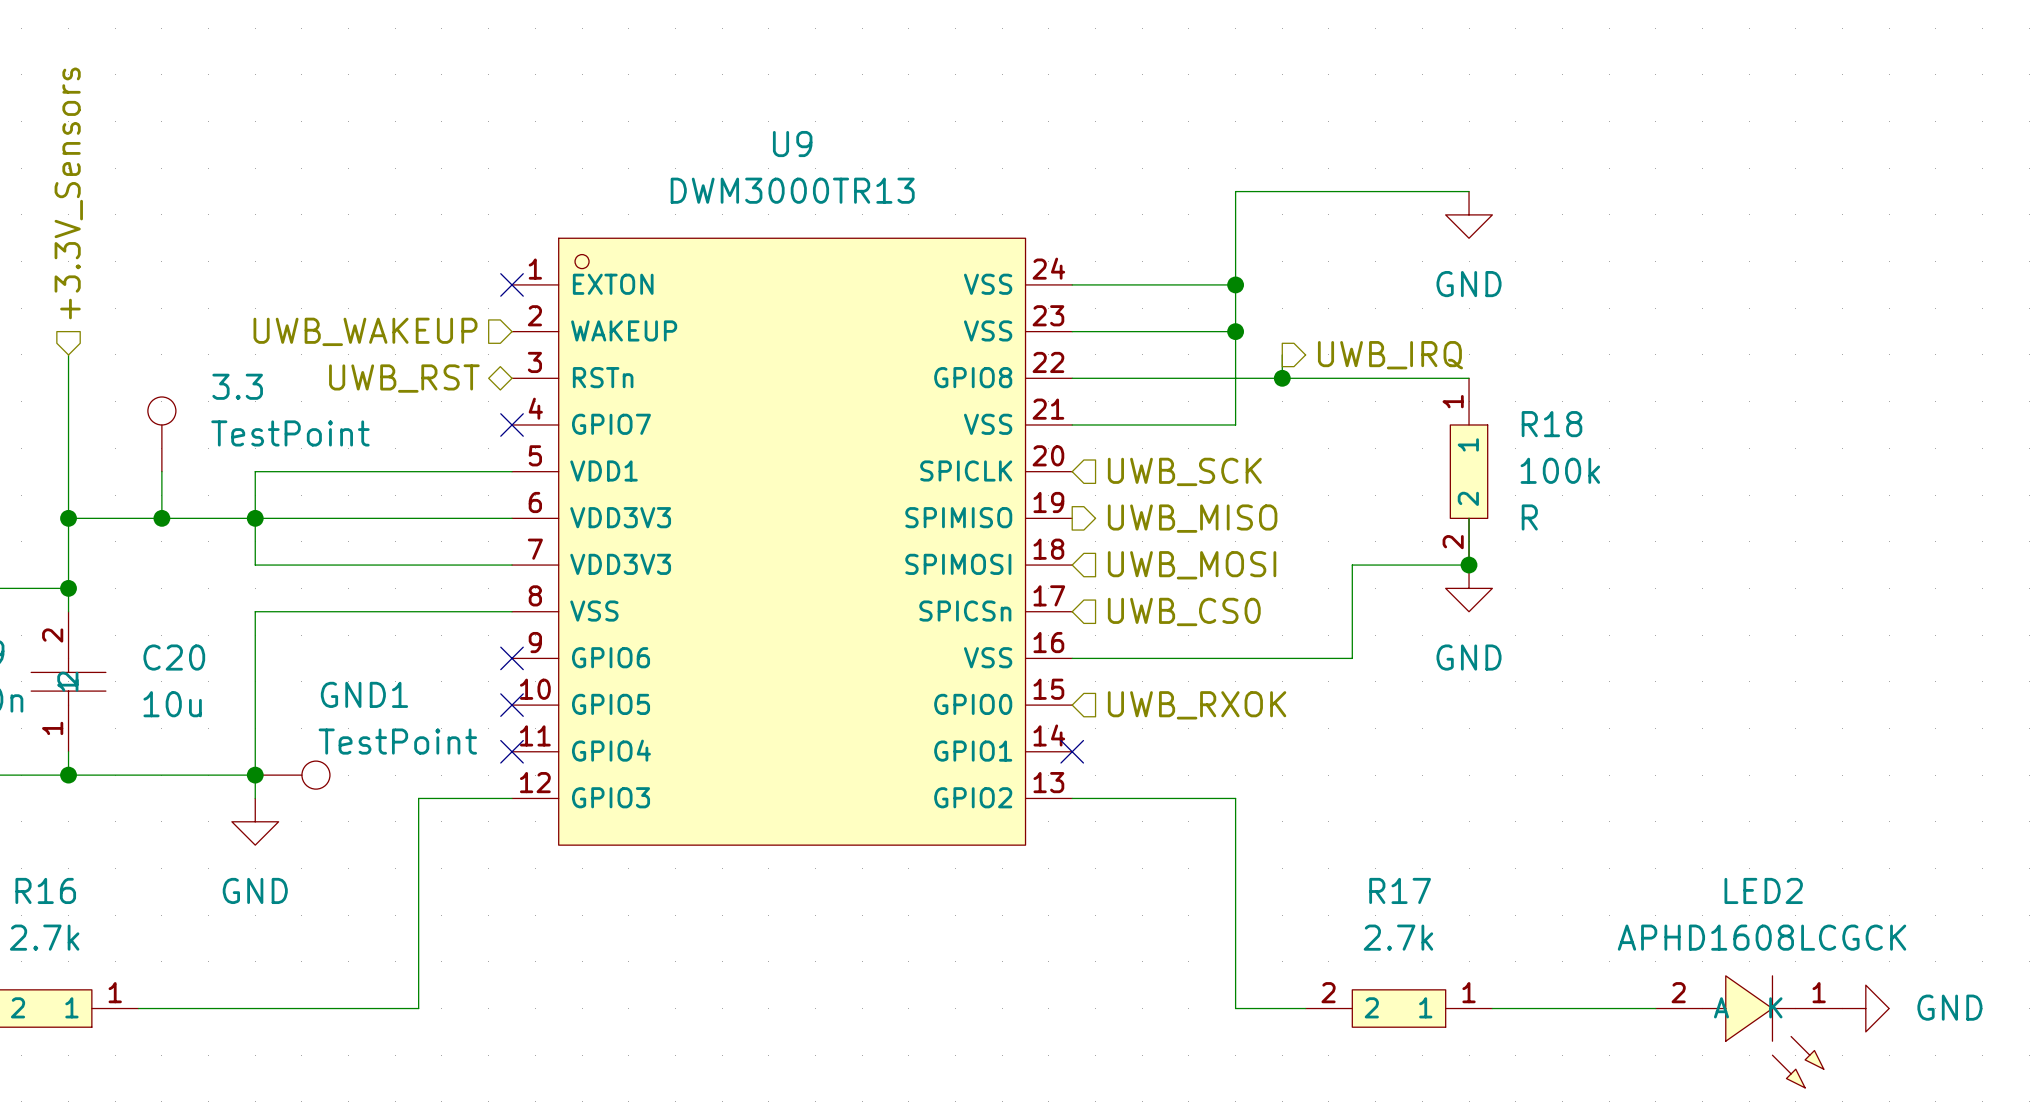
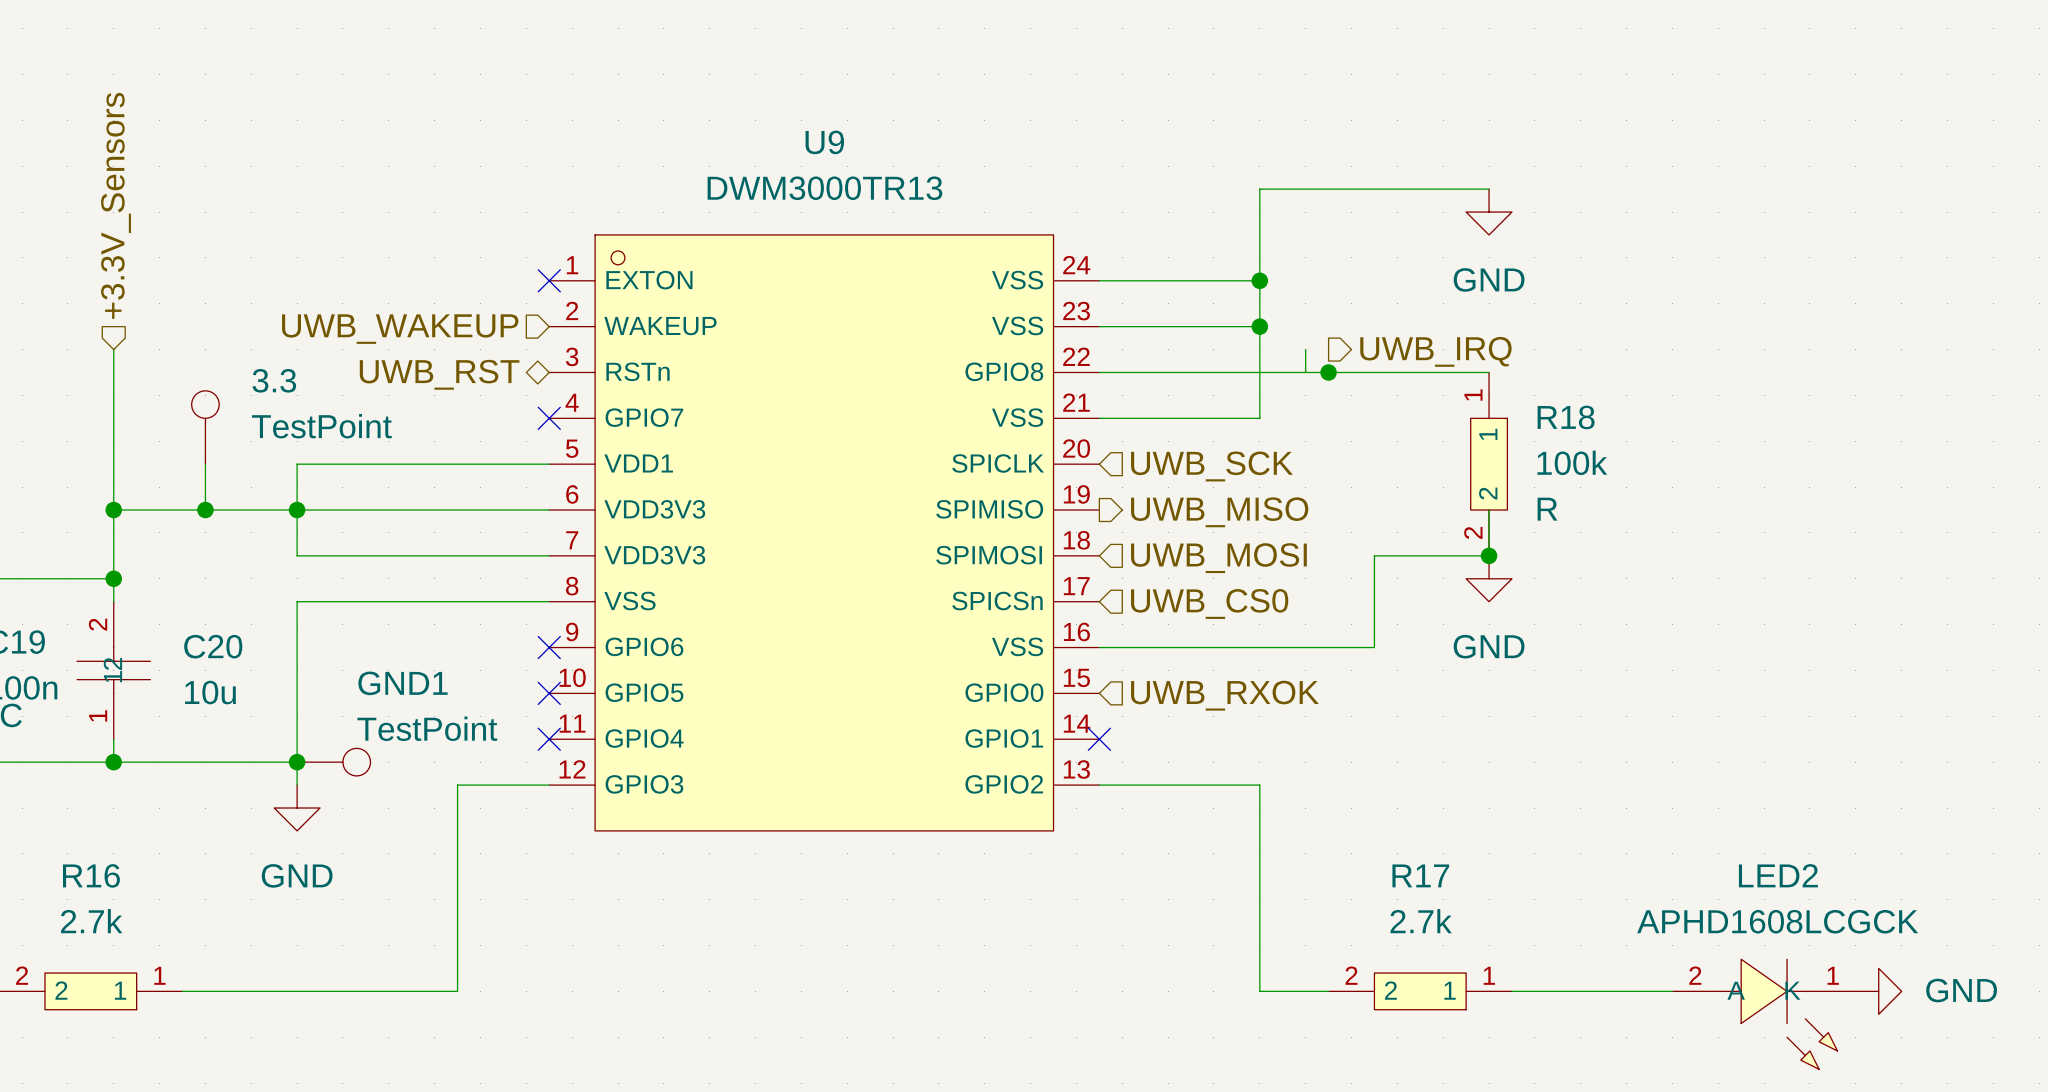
hierarchical label position: UWB_IRQ (1390, 355) -> UWB_IRQ (1435, 351)
junction position: (1282, 378) -> (1328, 372)

